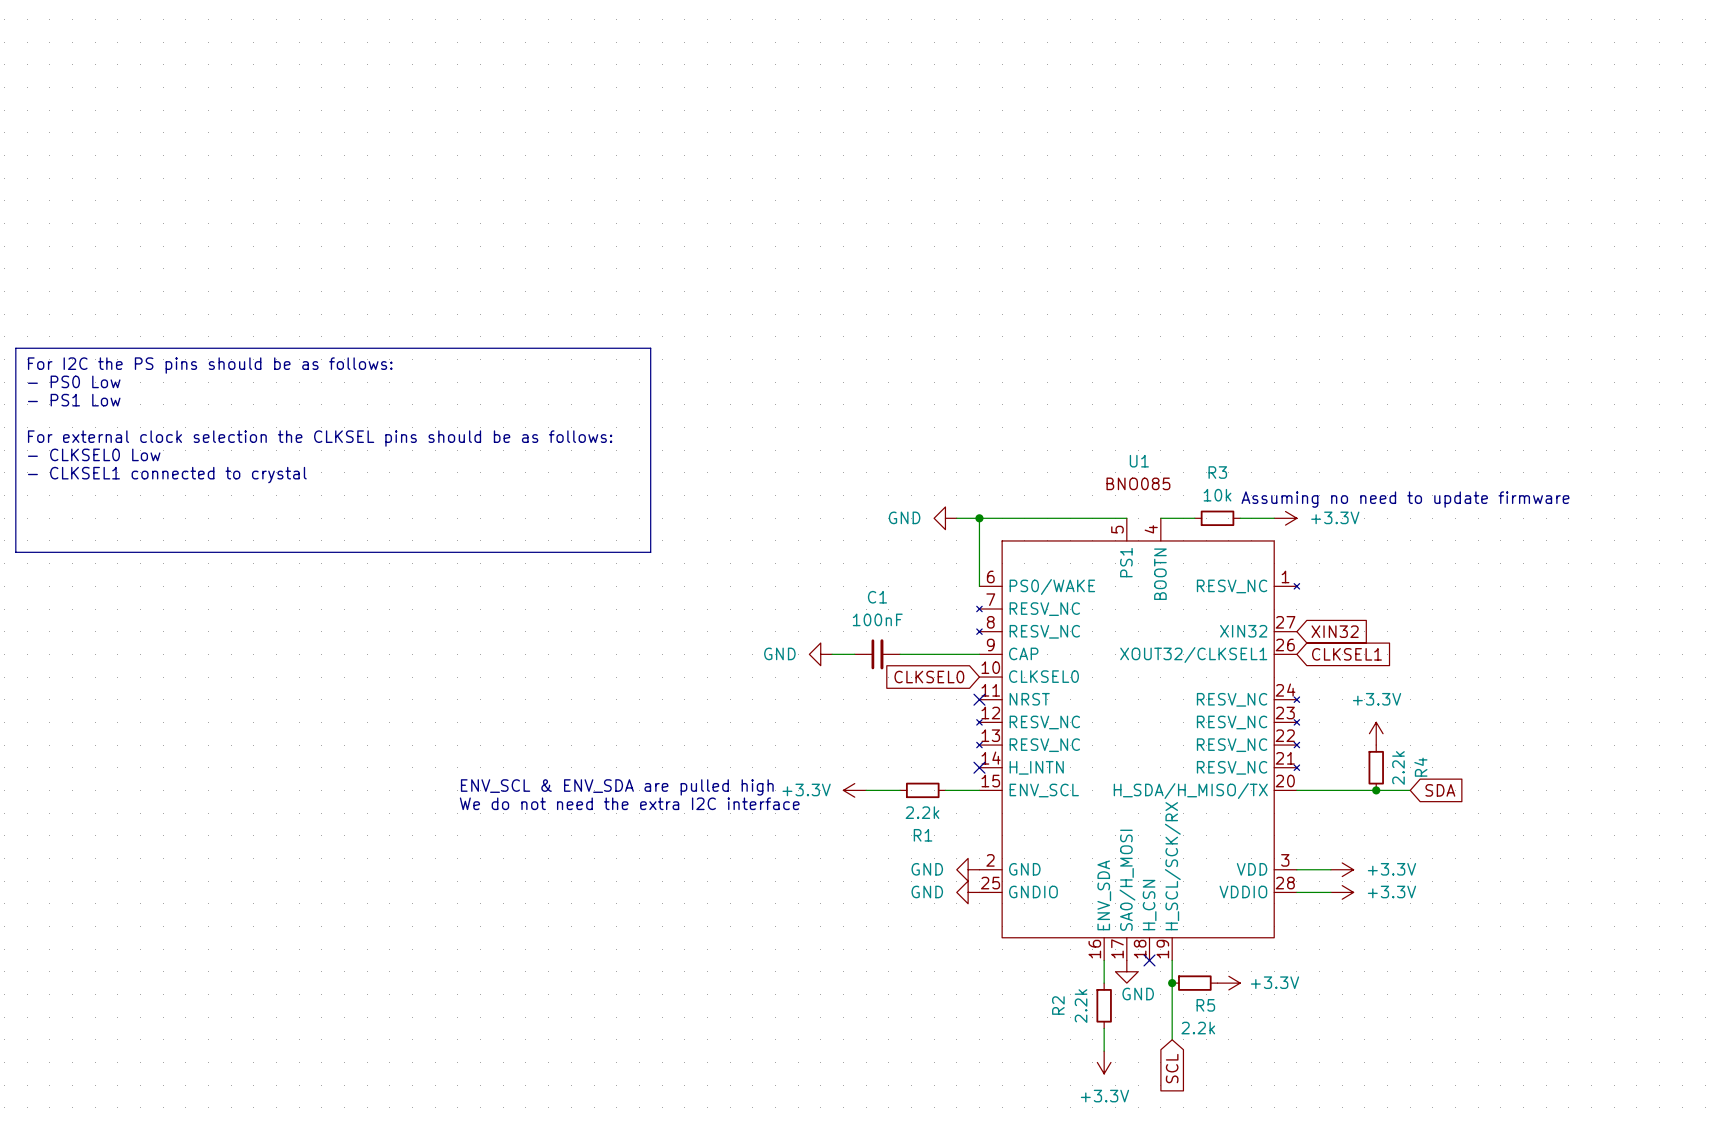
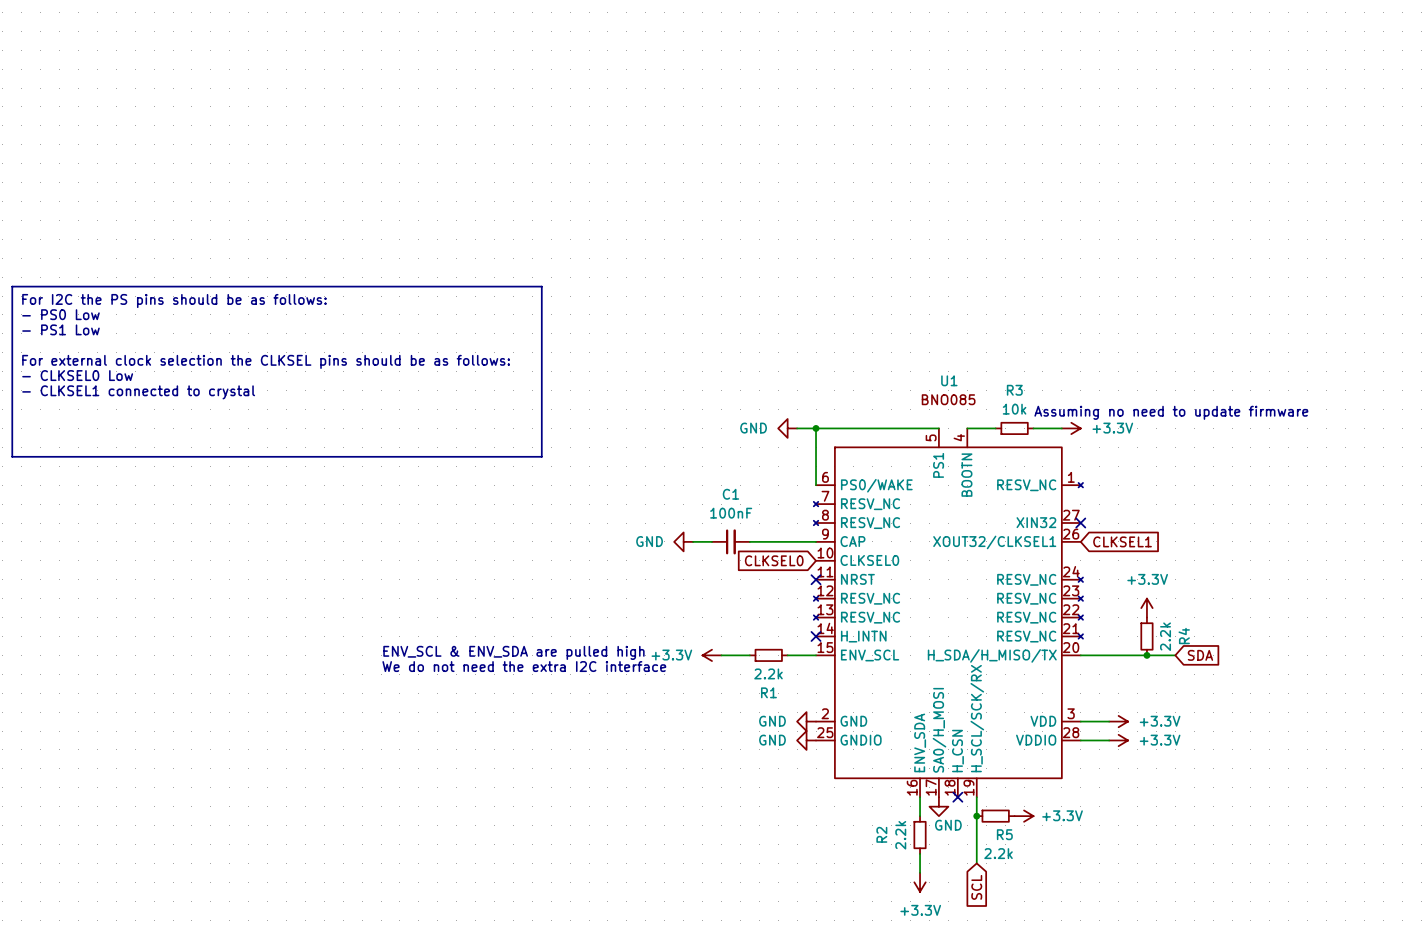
no-connect mark: none -> (1080, 523)
global label: XIN32 (1335, 631) -> none

